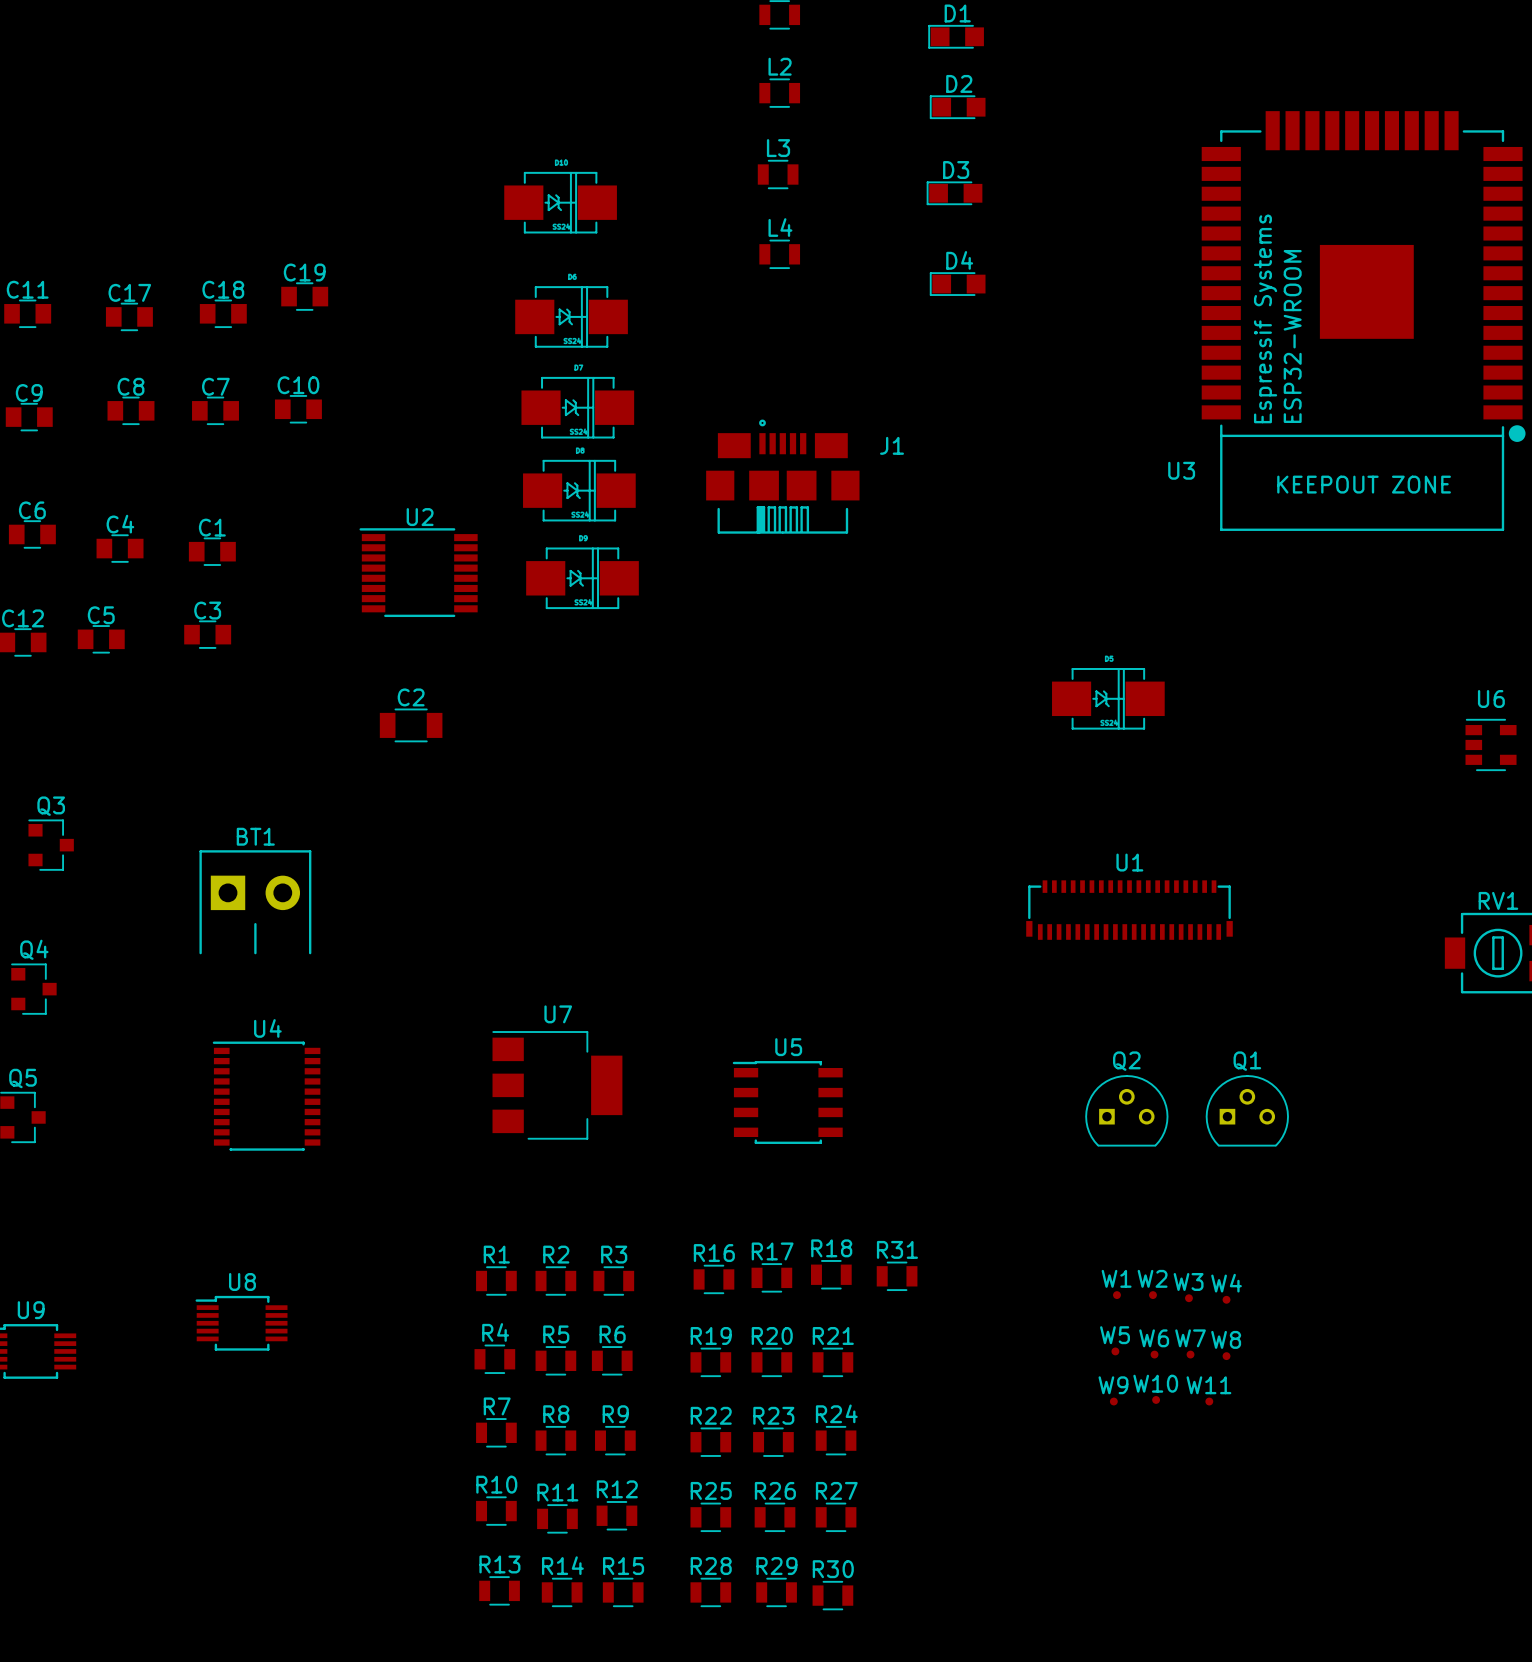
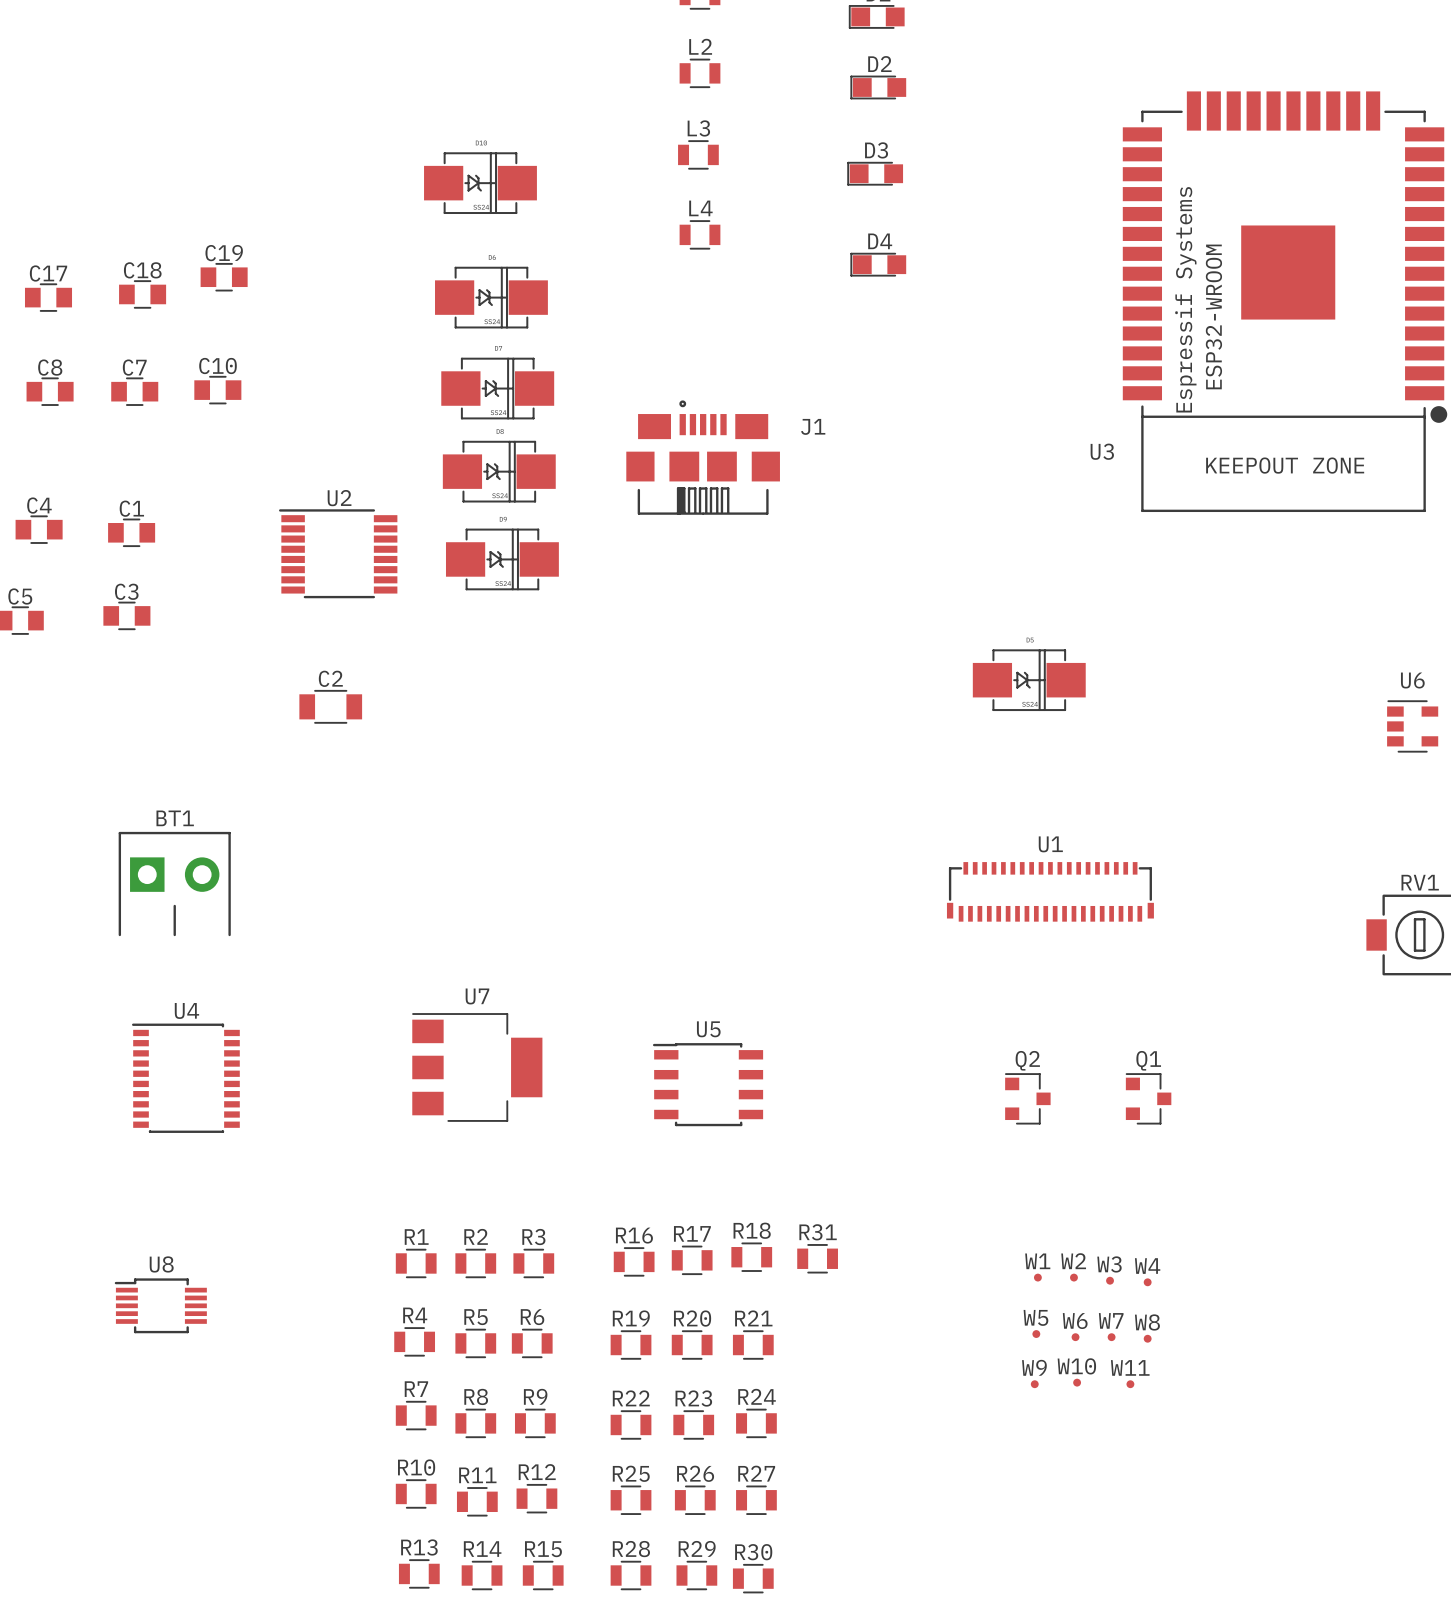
Q2 footprint: [1085, 1075, 1169, 1147] -> [1004, 1073, 1051, 1125]
Q1 footprint: [1205, 1075, 1289, 1147] -> [1125, 1073, 1172, 1125]

